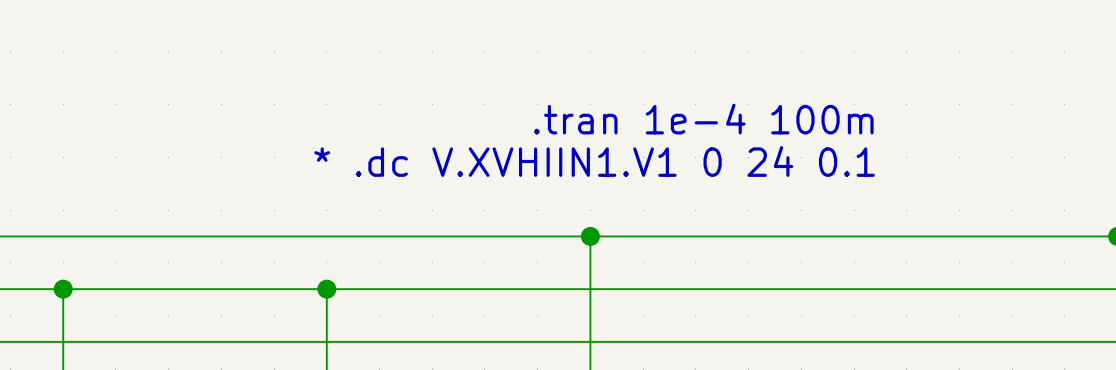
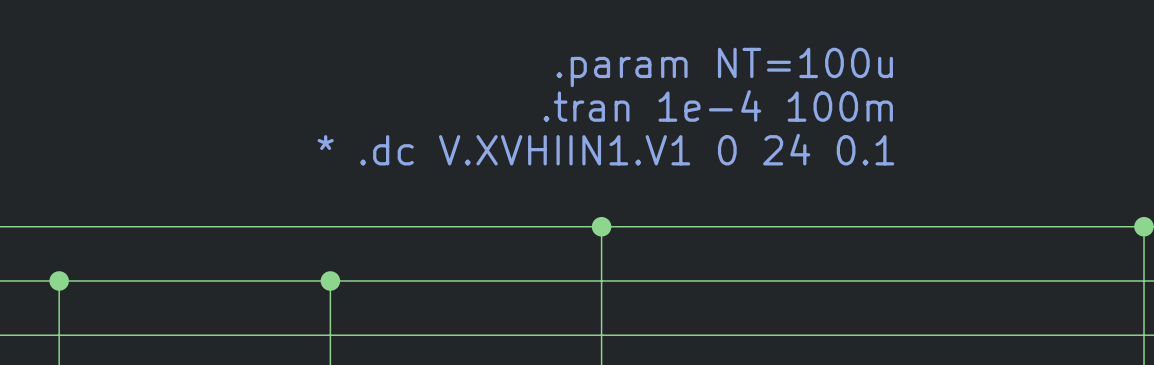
text: none -> .param NT=100u (724, 67)

